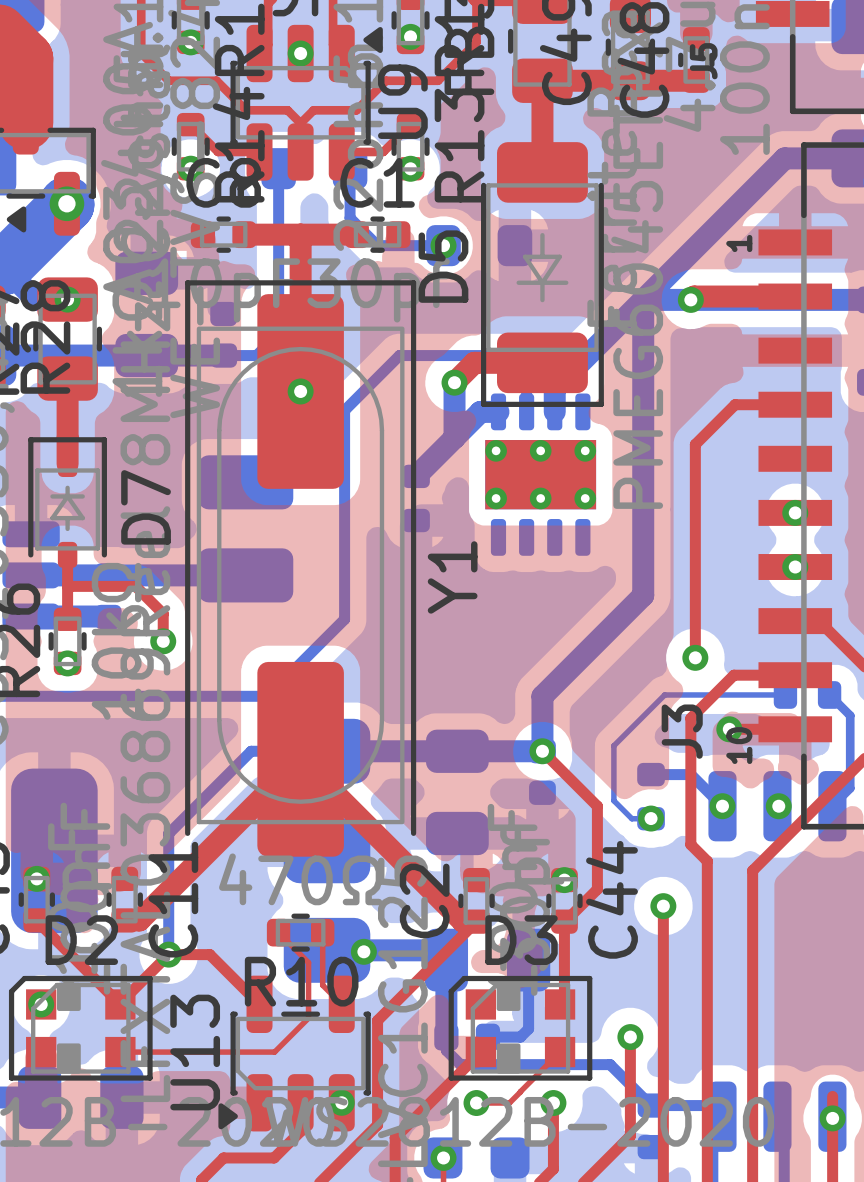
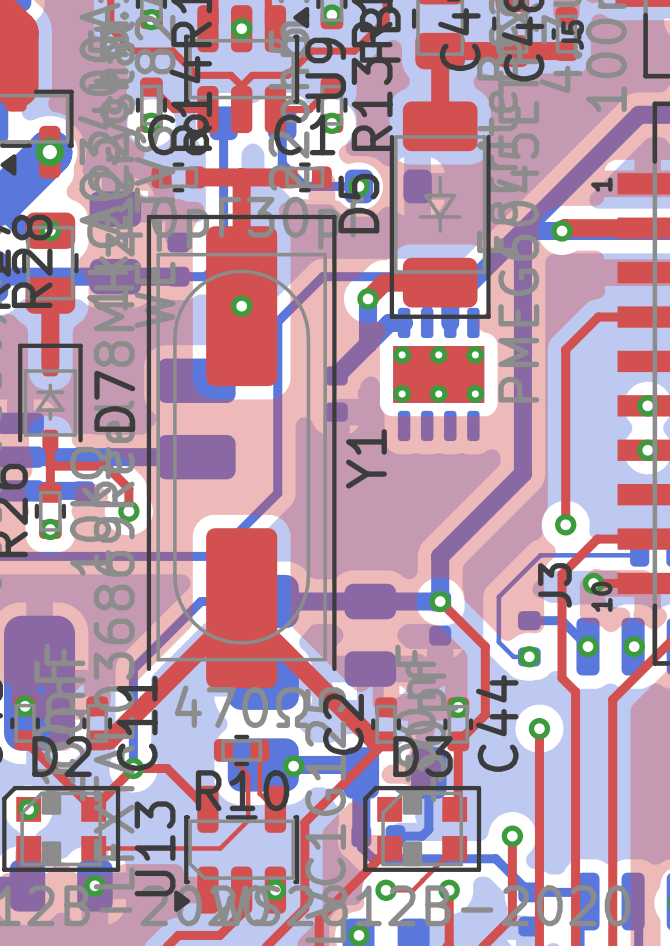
via: none -> (94, 885)

